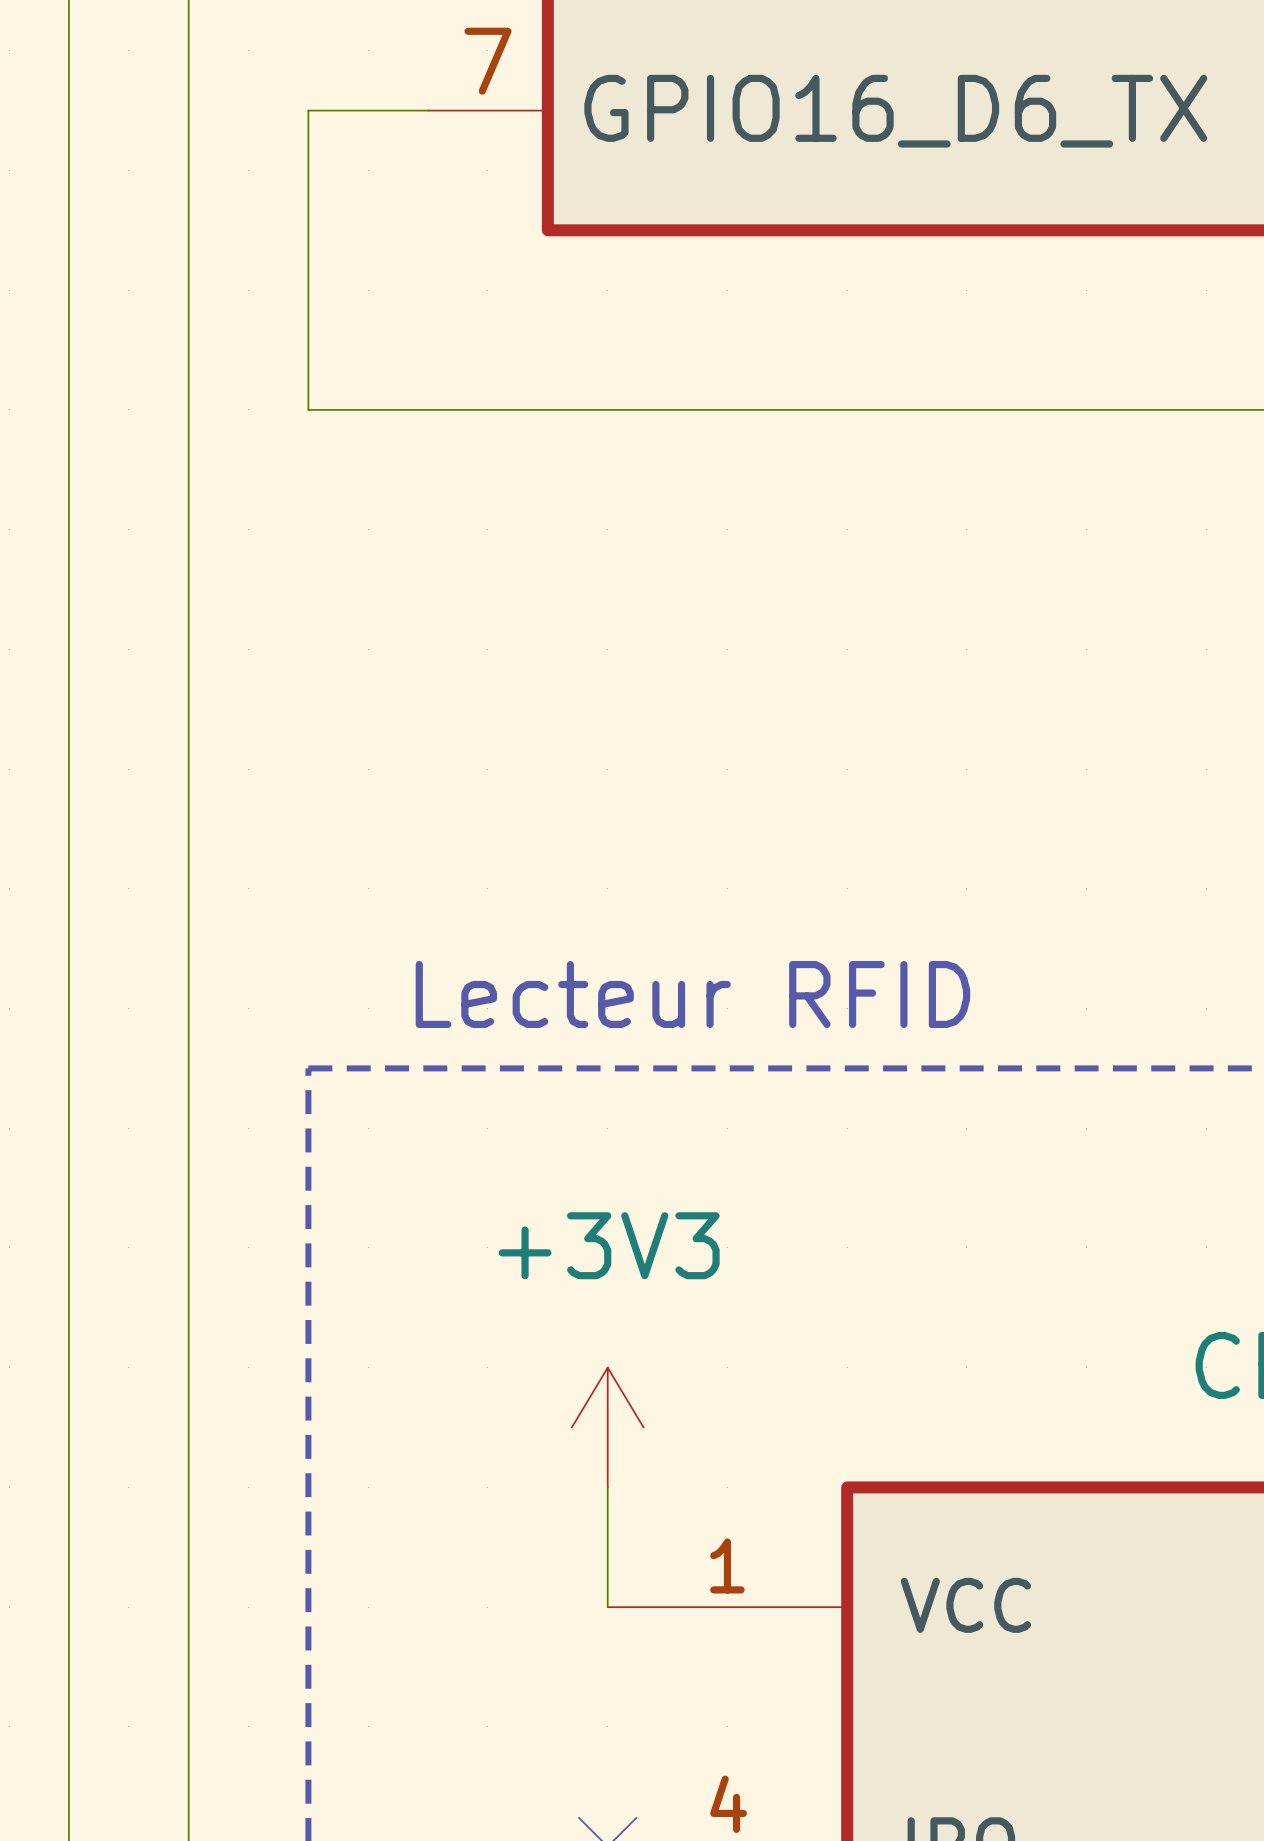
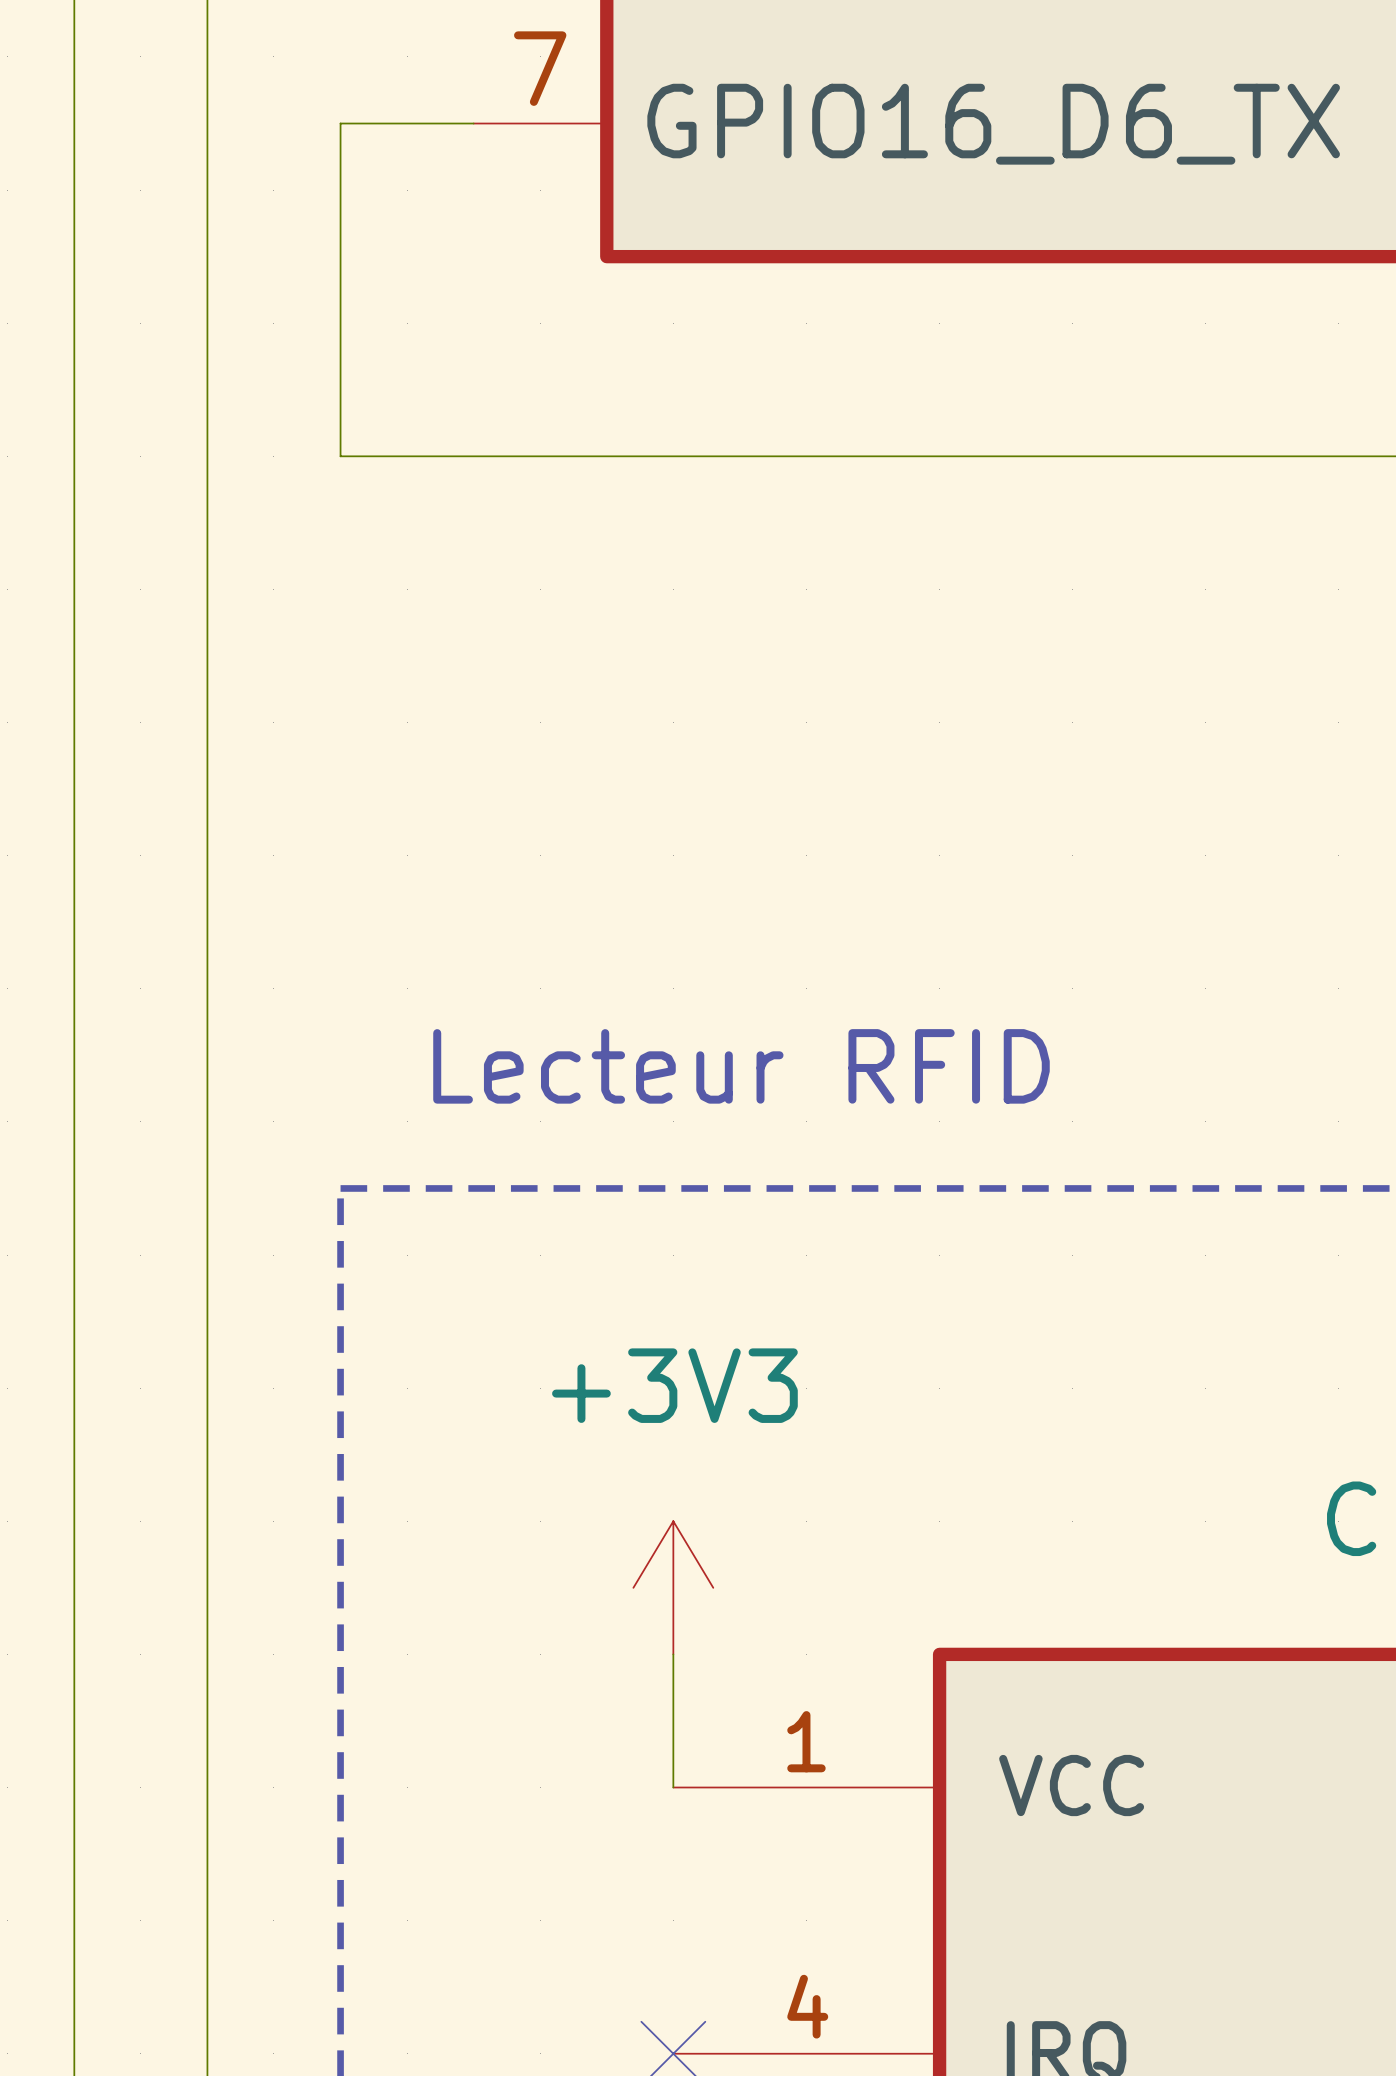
text position: Lecteur RFID (692, 994) -> Lecteur RFID (741, 1066)

